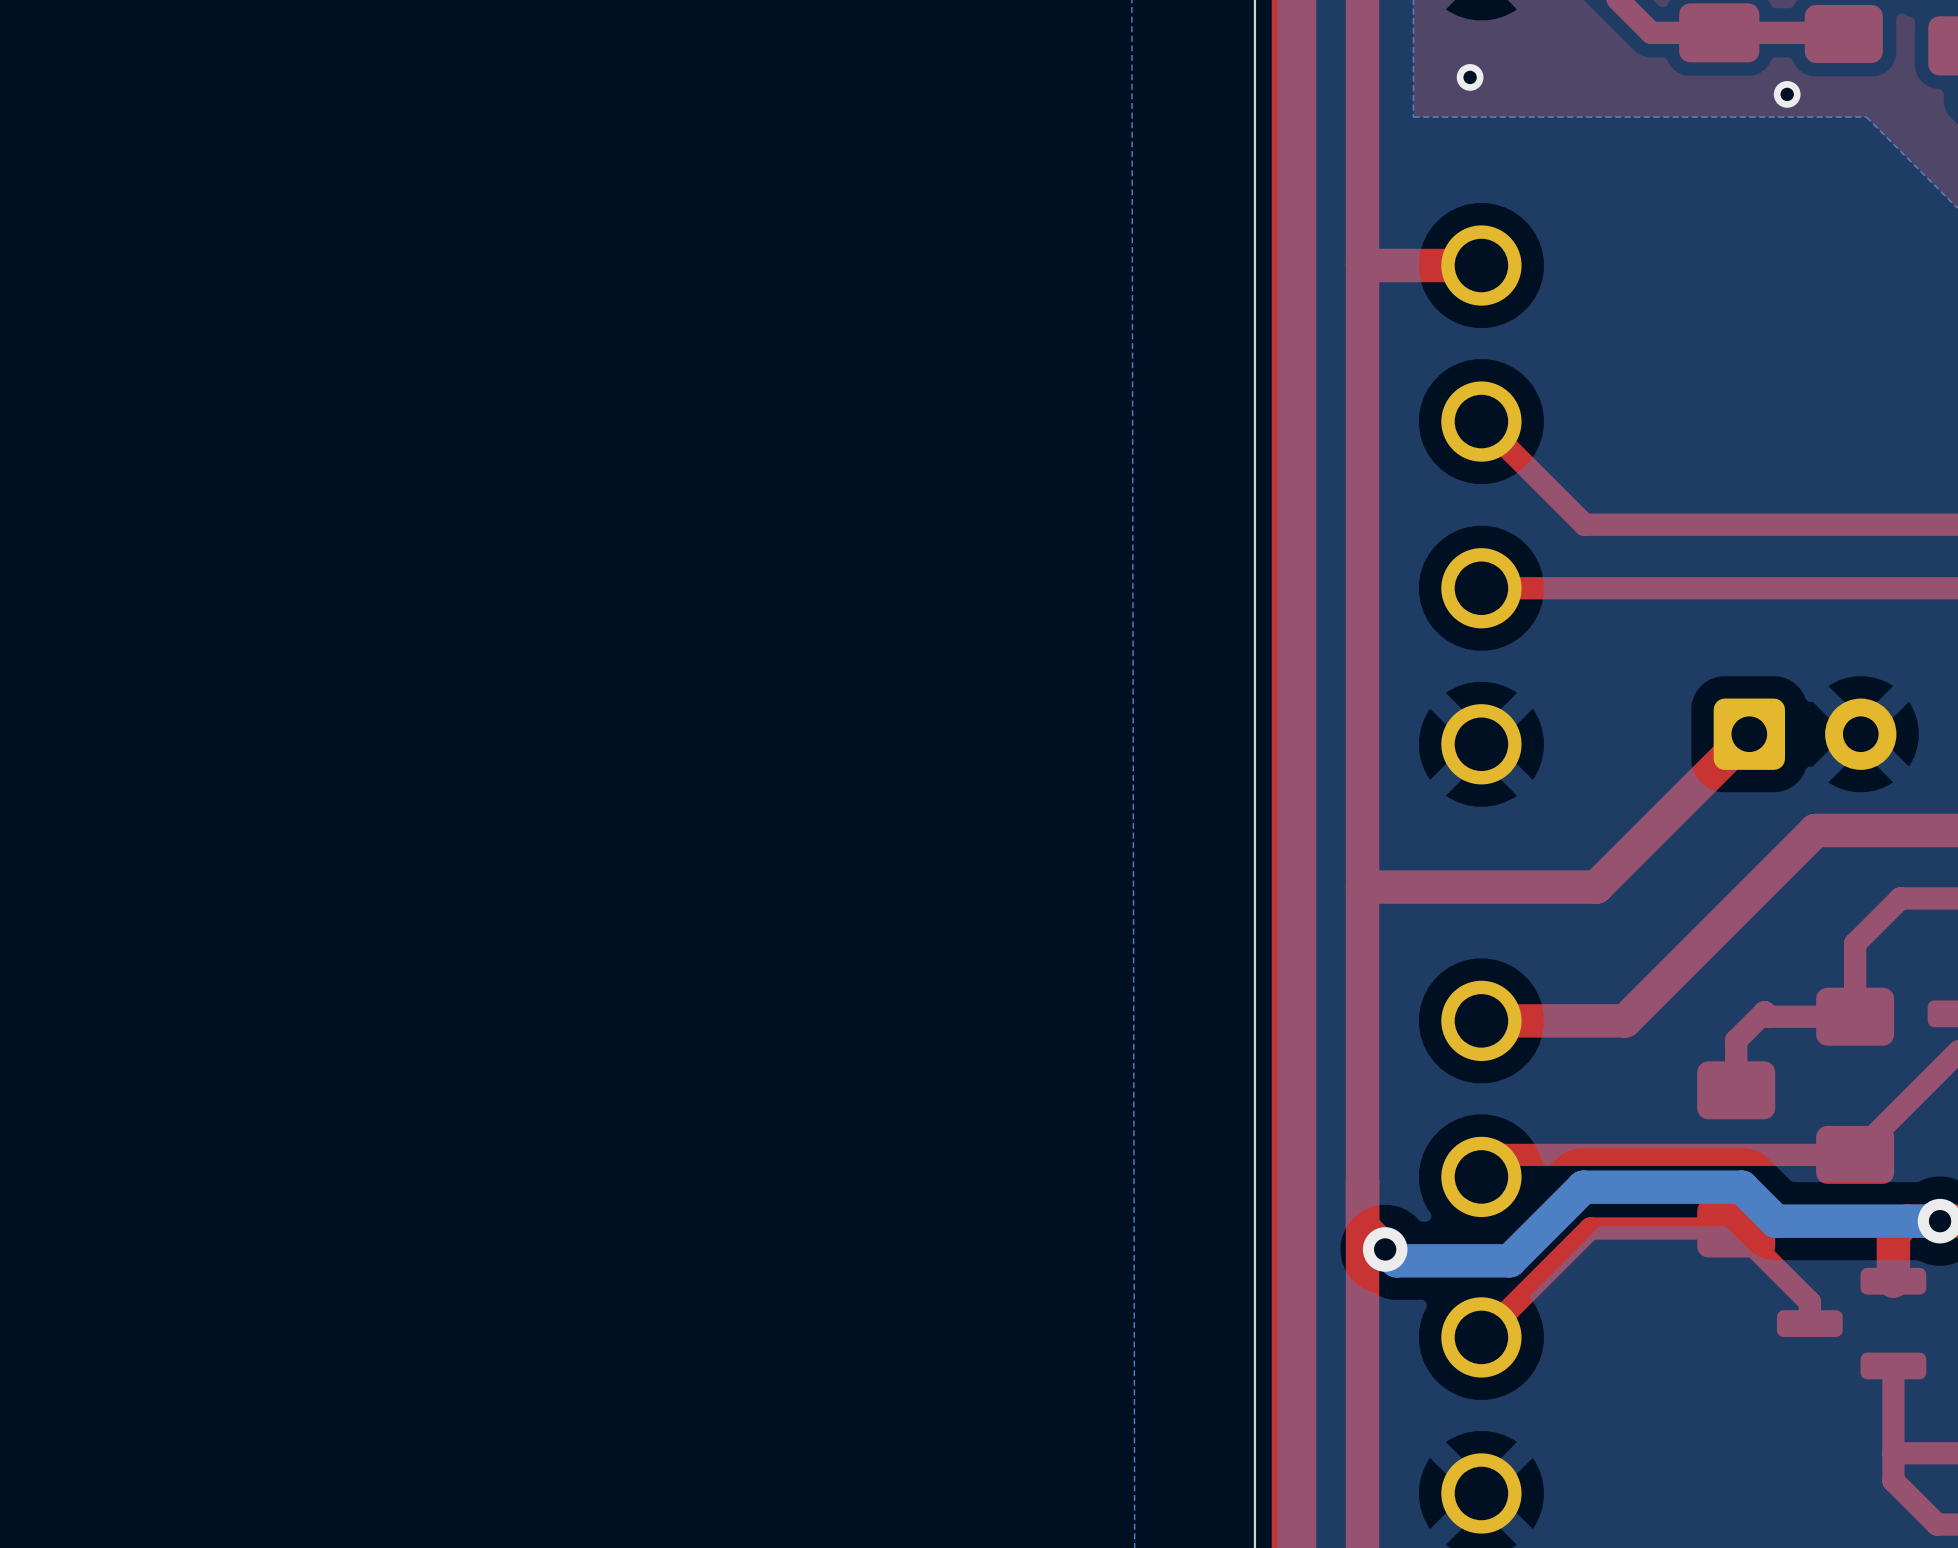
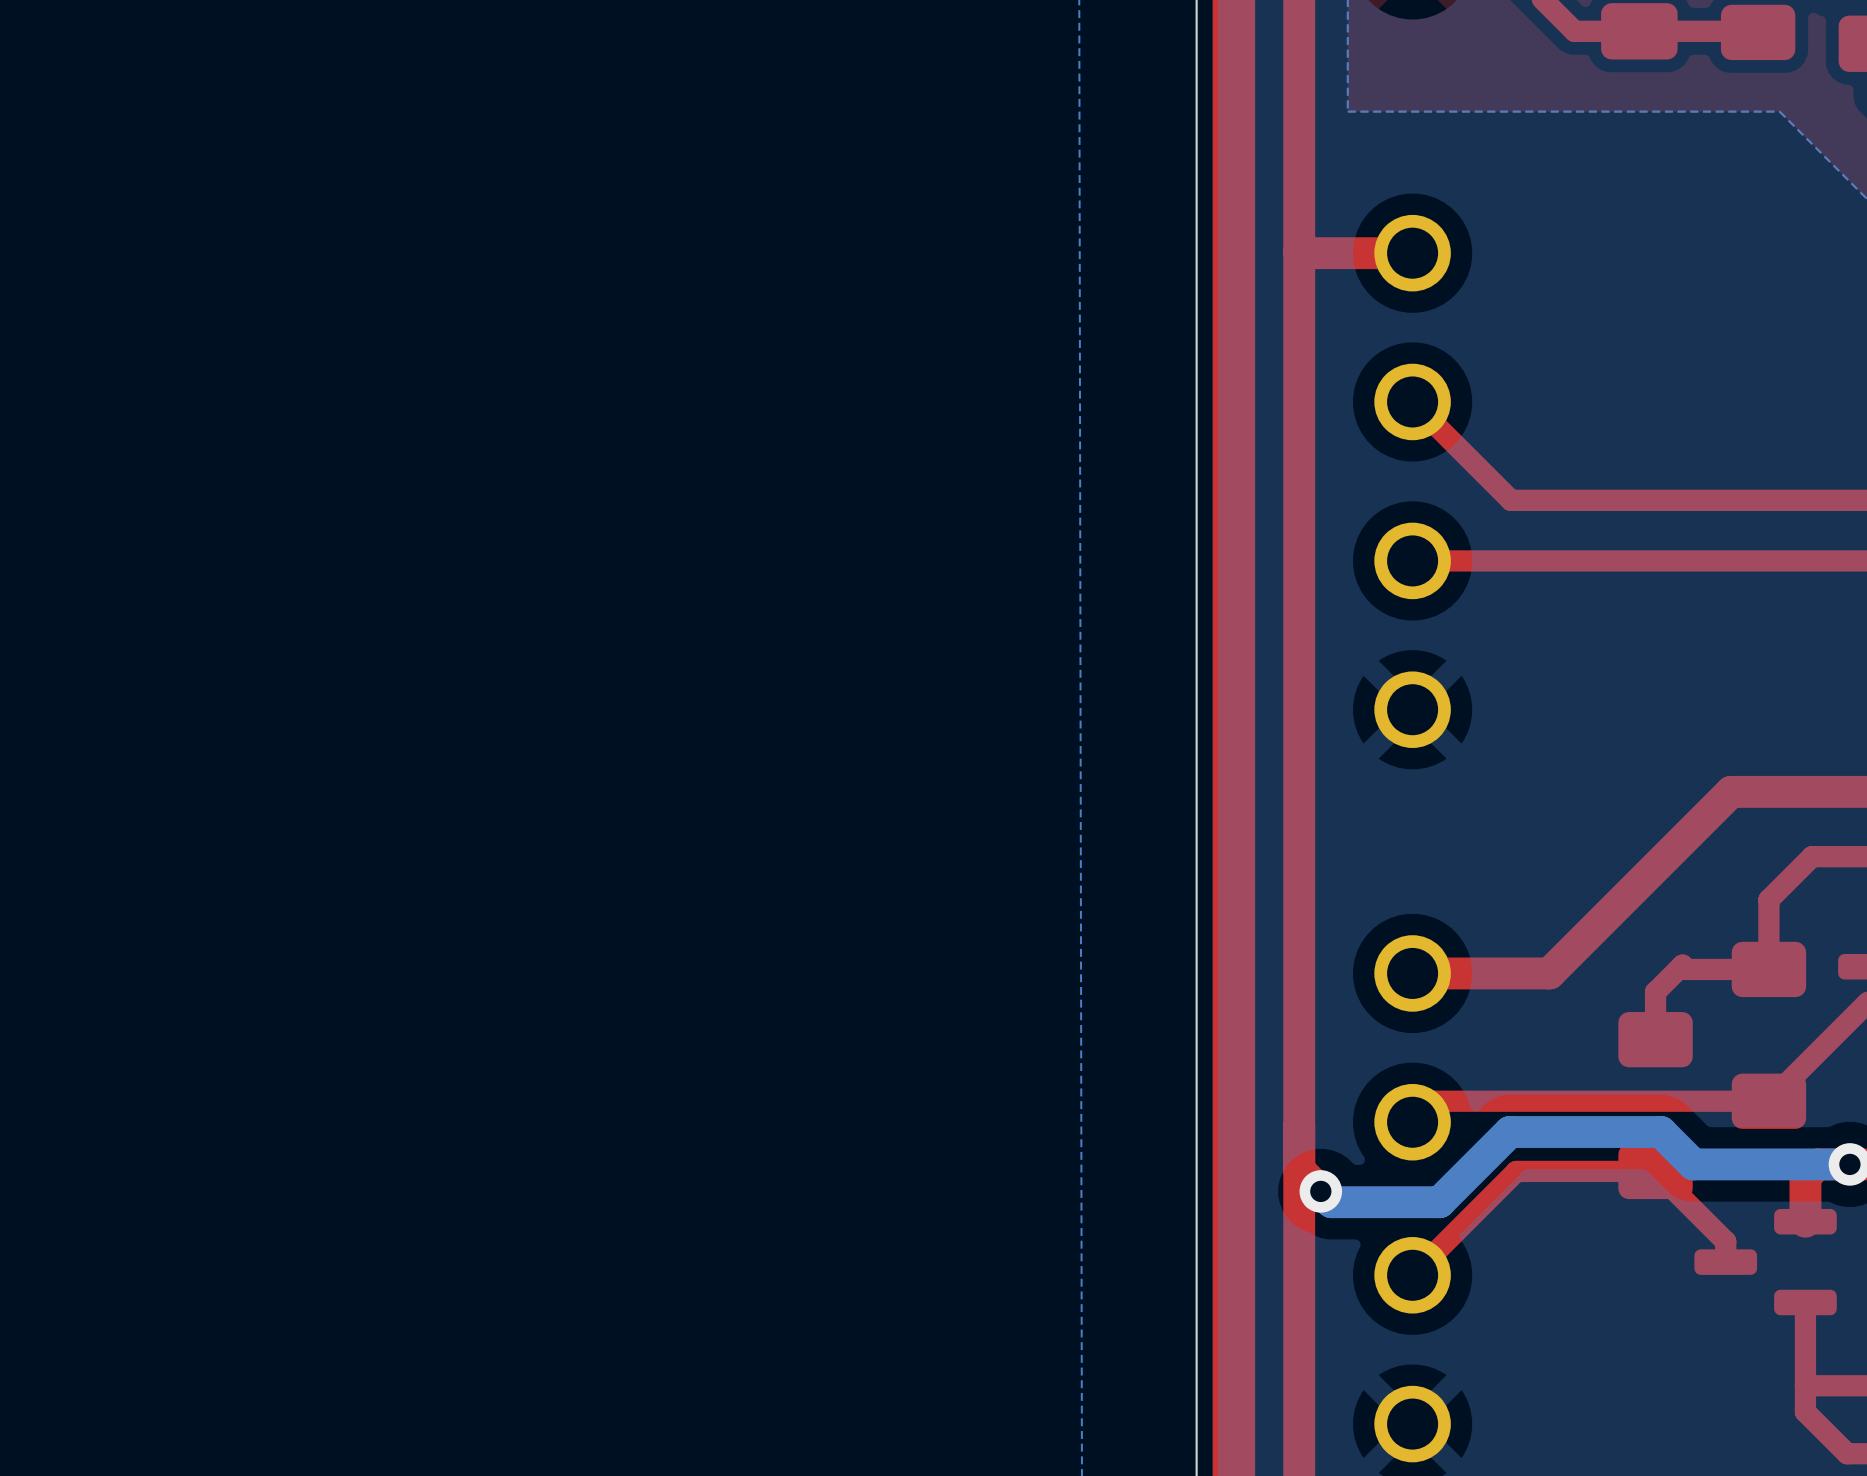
via: (1470, 77) -> none
via: (1787, 94) -> none
top track: (1749, 734) (1596, 887) (1362, 887) -> none
part: (1805, 734) -> none

